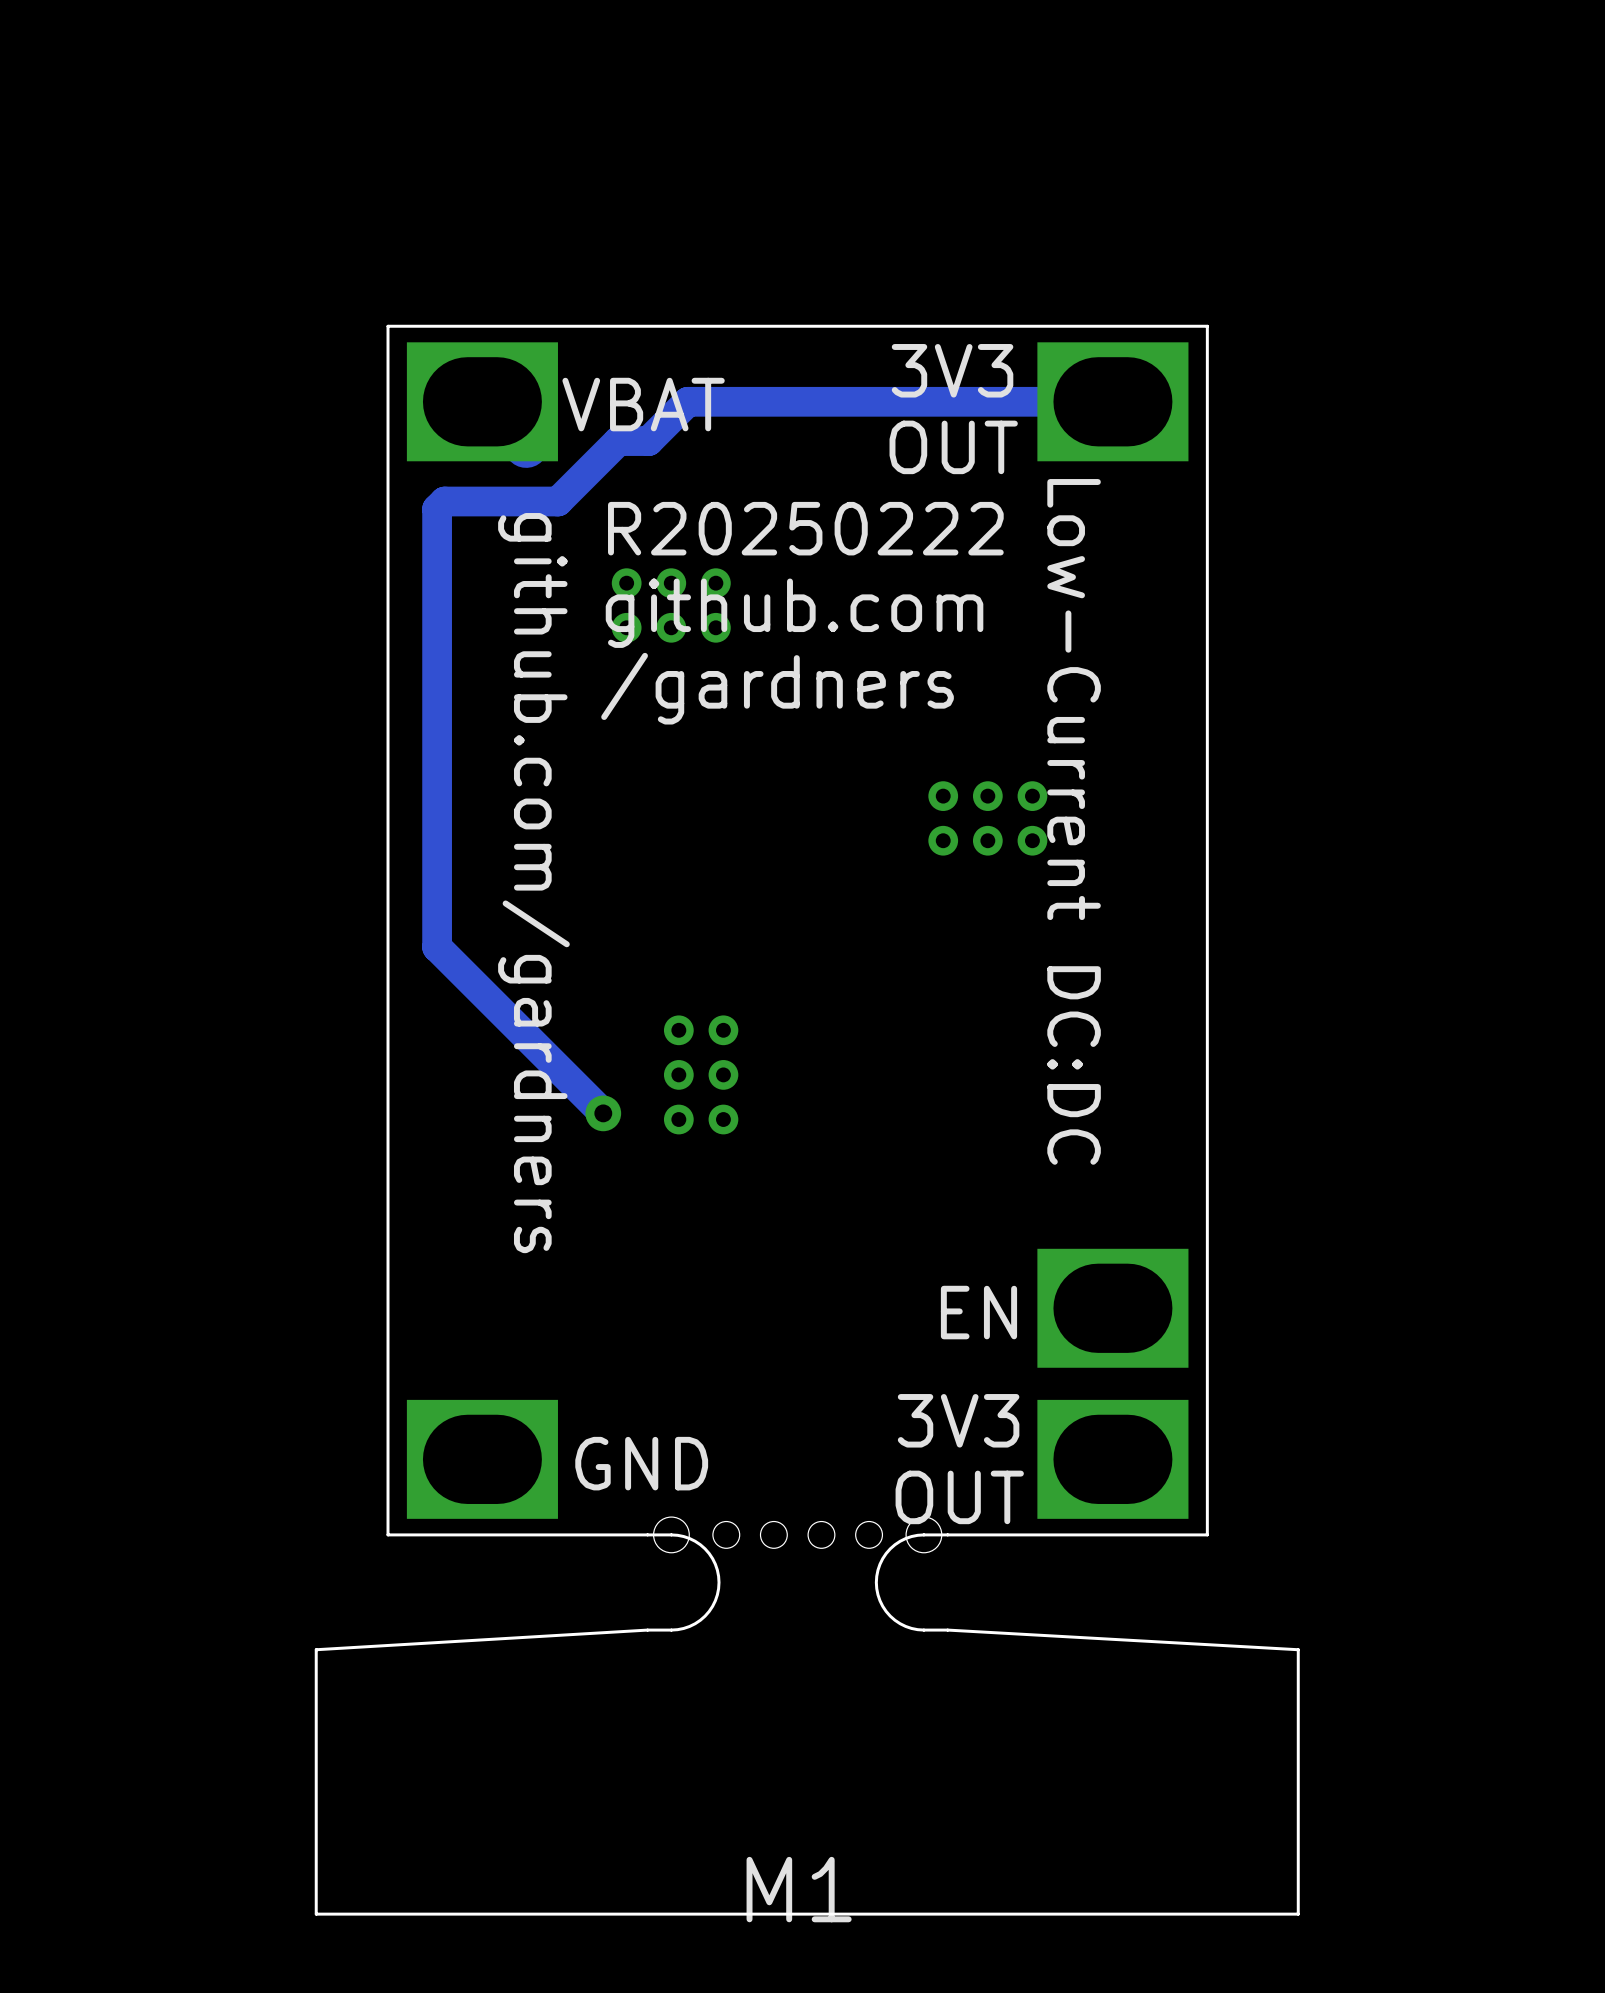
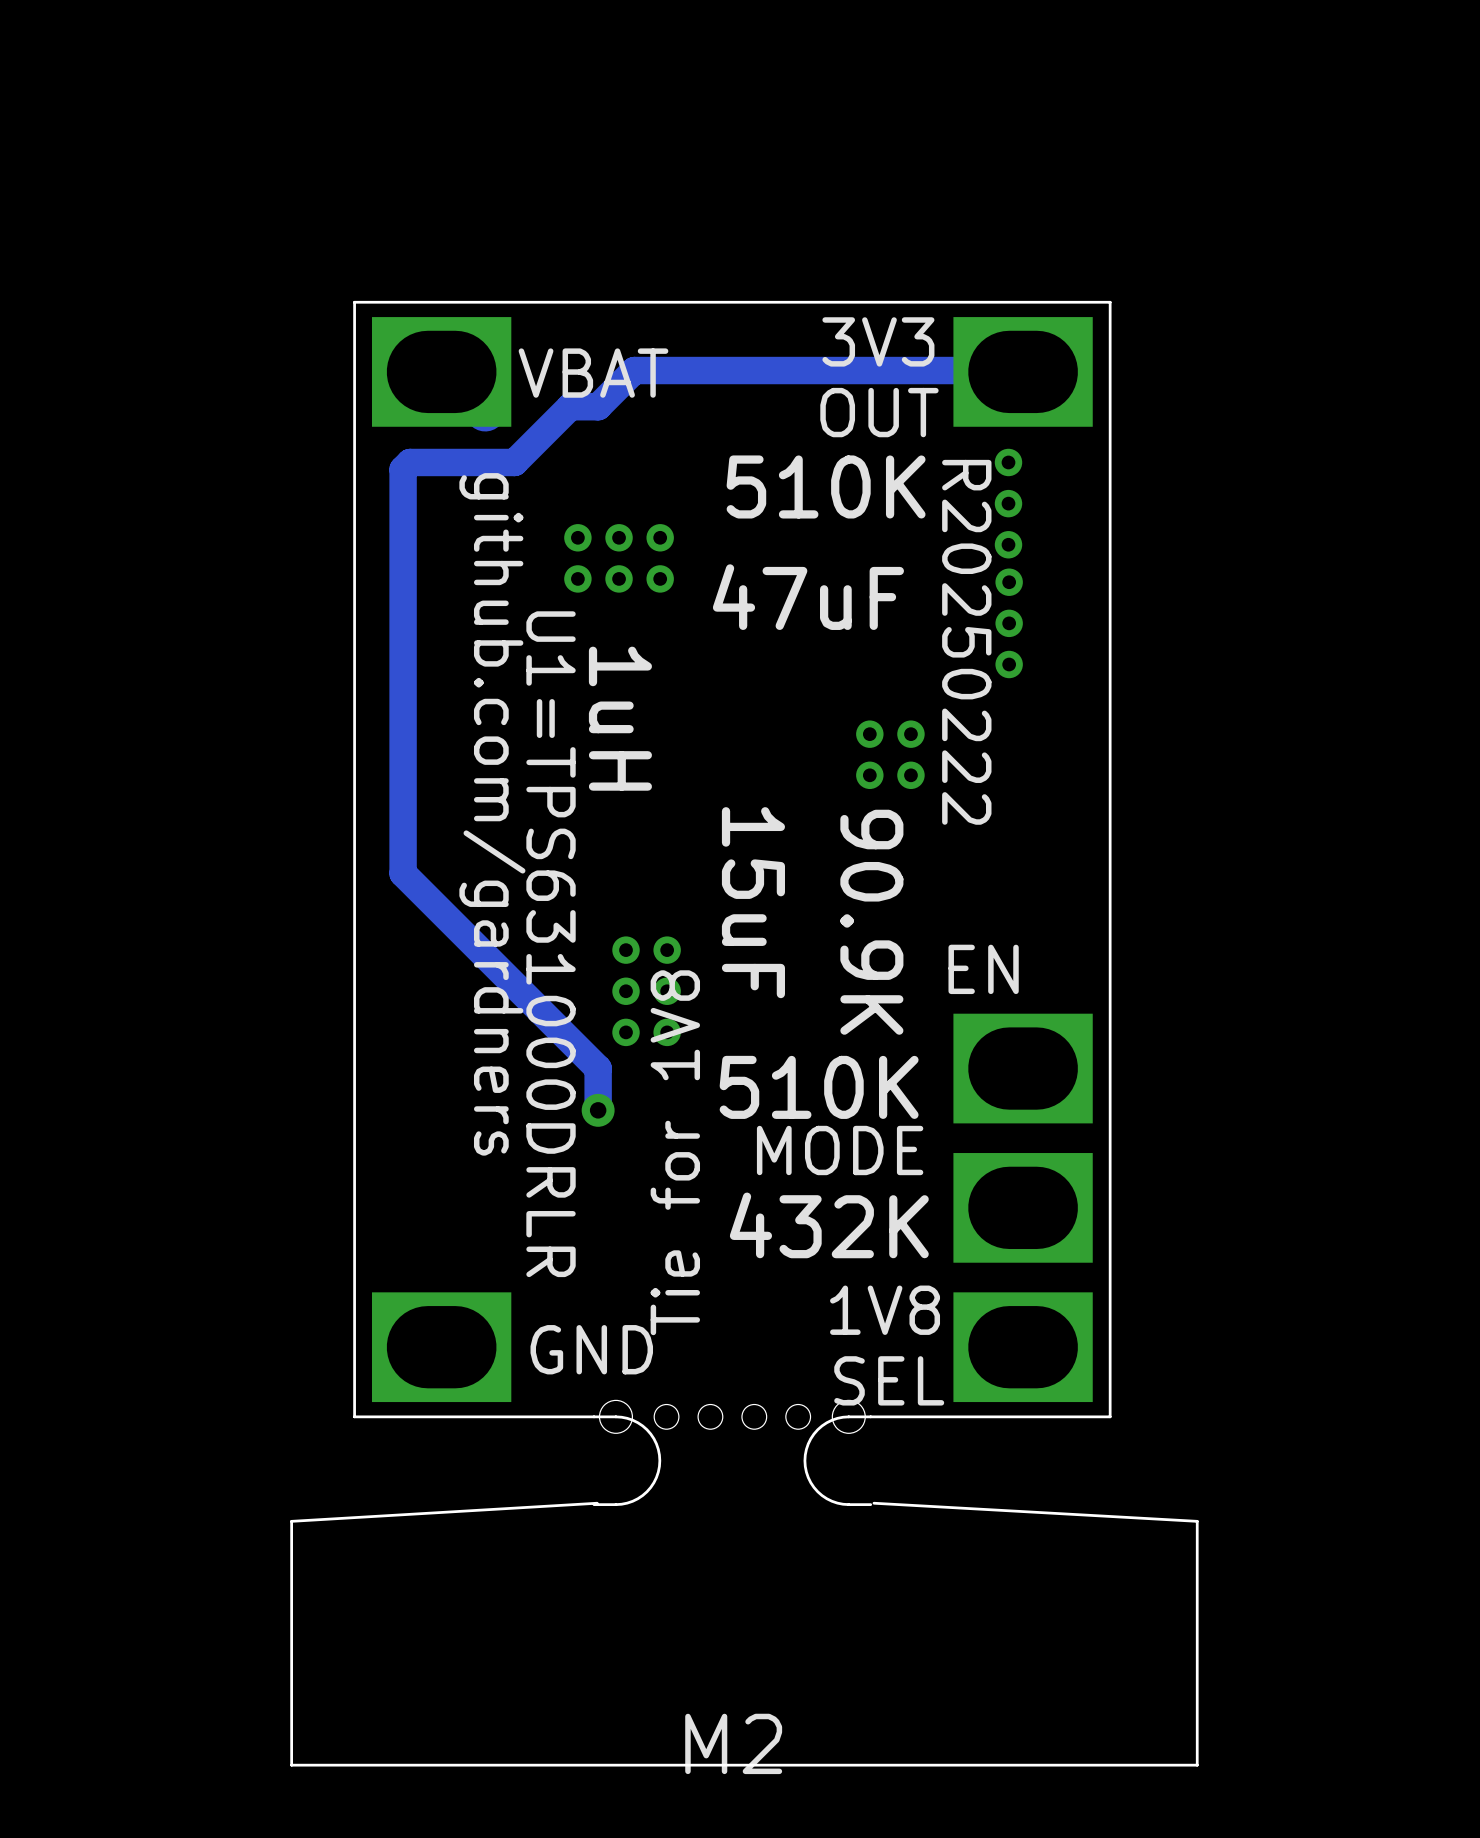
via: none -> (1008, 462)
text rotation: 0° (805, 528) -> 90° clockwise (966, 642)
part: none -> 510K (826, 486)
via: none -> (1008, 503)
via: none -> (1008, 544)
text: github.com (794, 613) -> none
via: none -> (1009, 582)
part: none -> 47uF (808, 597)
via: none -> (1009, 623)
text: /gardners (777, 688) -> none
via: none -> (1009, 664)
part: none -> 1uH (620, 718)
via: (1032, 796) -> none
text: Low-Current DC:DC (1074, 821) -> none
via: (1032, 840) -> none
M1: (797, 978) -> none
part: none -> 15uF (753, 902)
M2: none -> (732, 903)
part: none -> 90.9K (871, 922)
part: none -> U1=TPS631000DRLR (551, 944)
track: none -> (556, 1026) (598, 1068) (598, 1110)
via position: (603, 1113) -> (598, 1110)
part: none -> 510K (819, 1087)
text: none -> MODE (840, 1150)
text: none -> Tie for 1V8 (675, 1152)
text position: EN (978, 1312) -> EN (983, 969)
part: none -> 432K (829, 1225)
text: 3V3 (958, 1420) -> 1V8 (885, 1310)
text: OUT (959, 1497) -> SEL (889, 1380)

